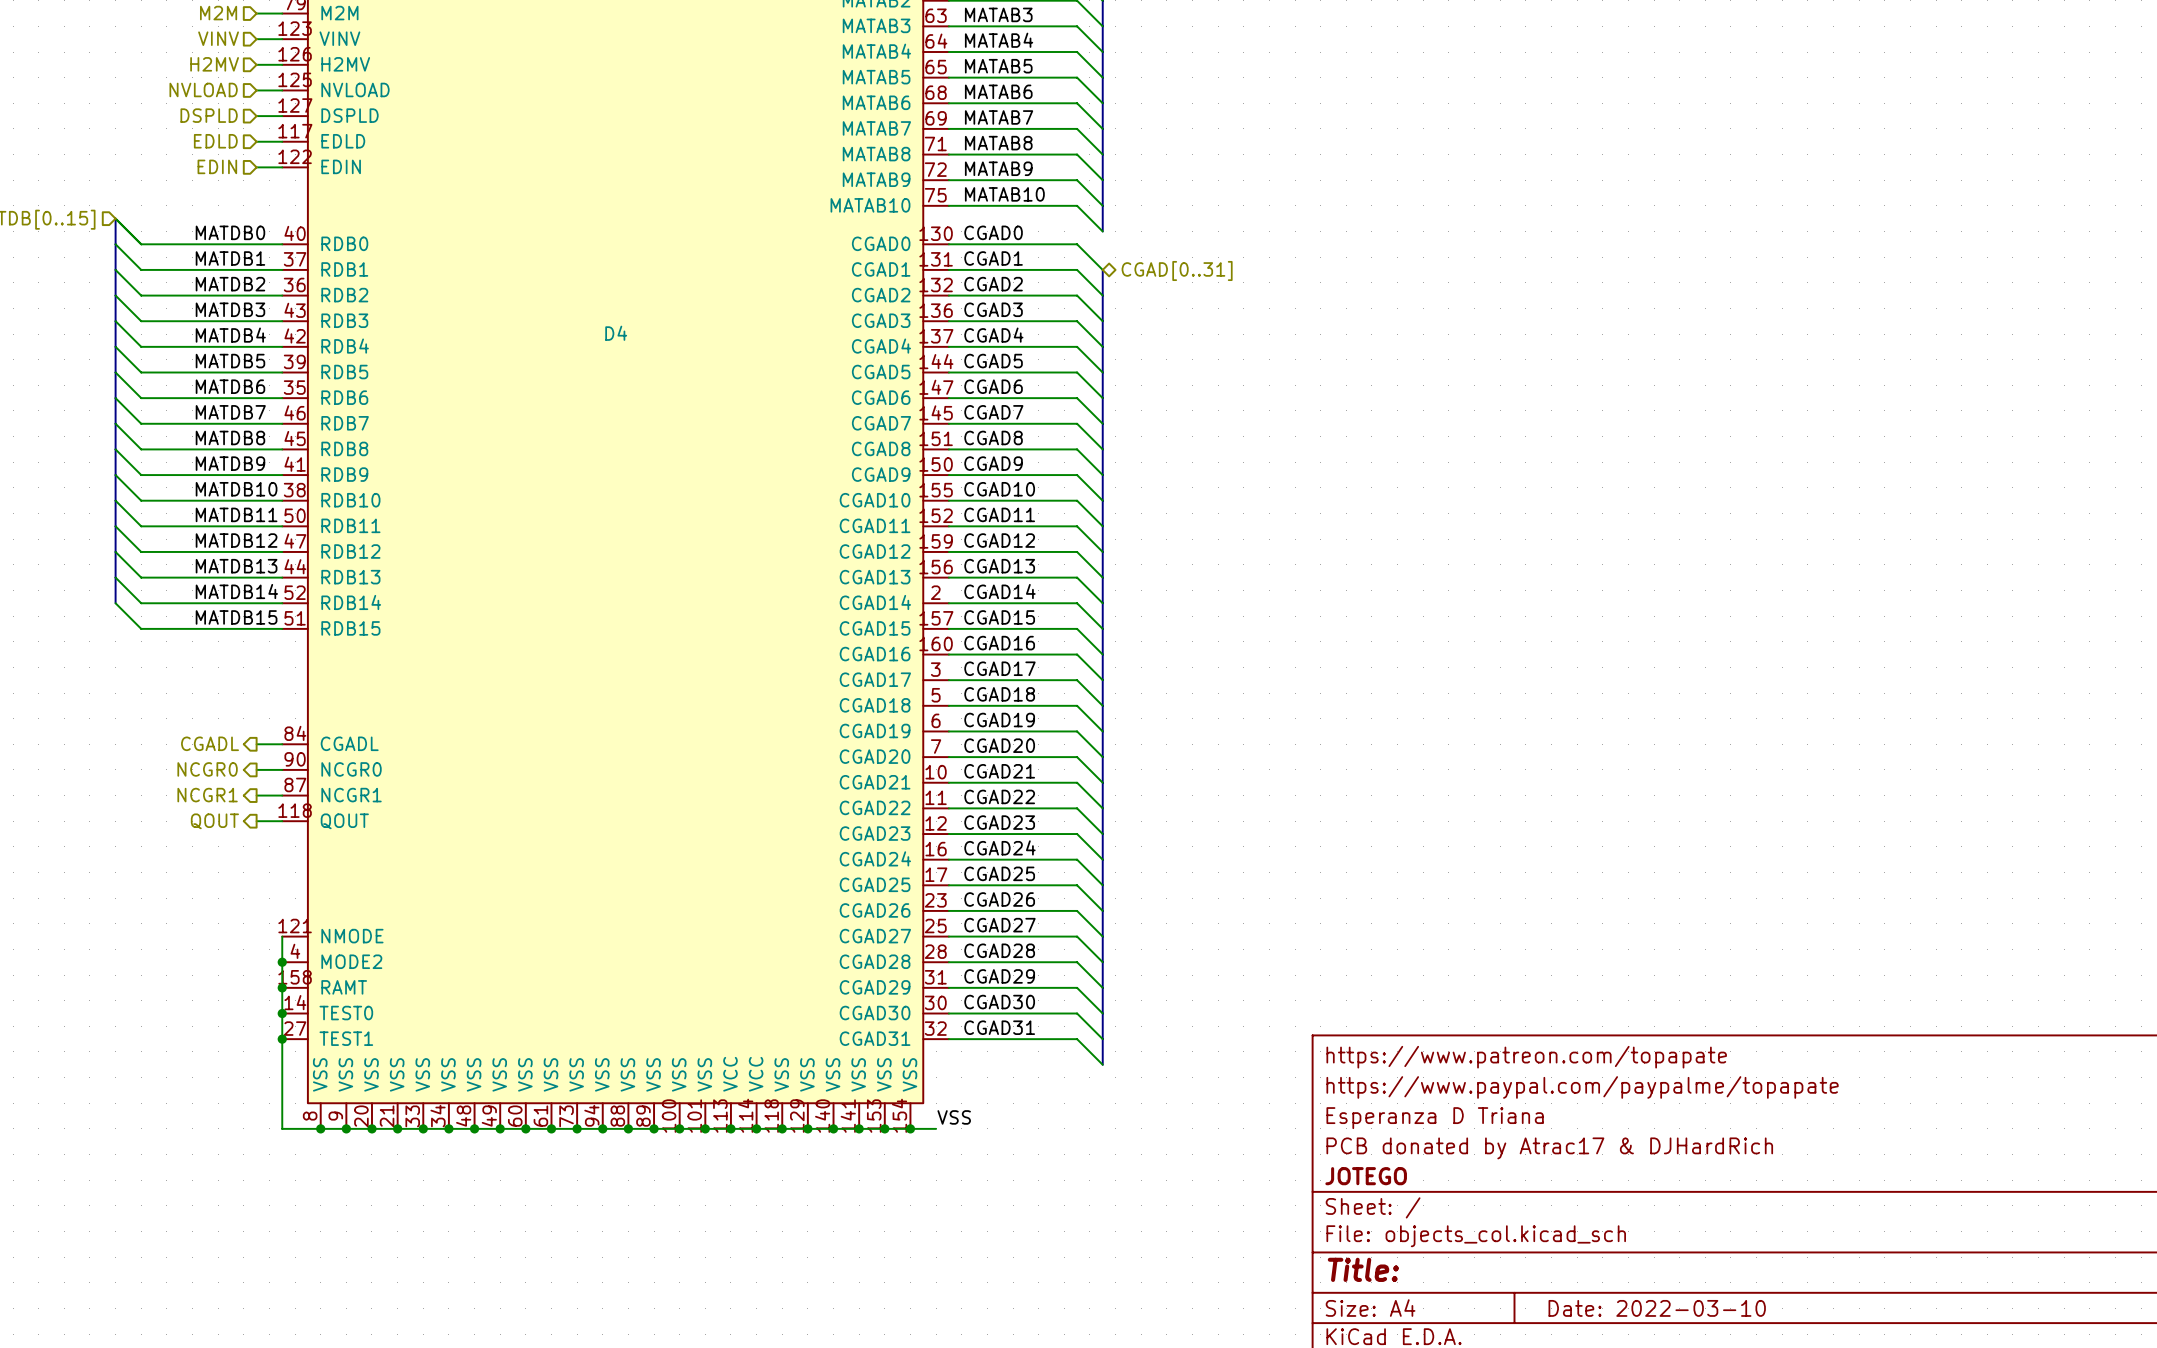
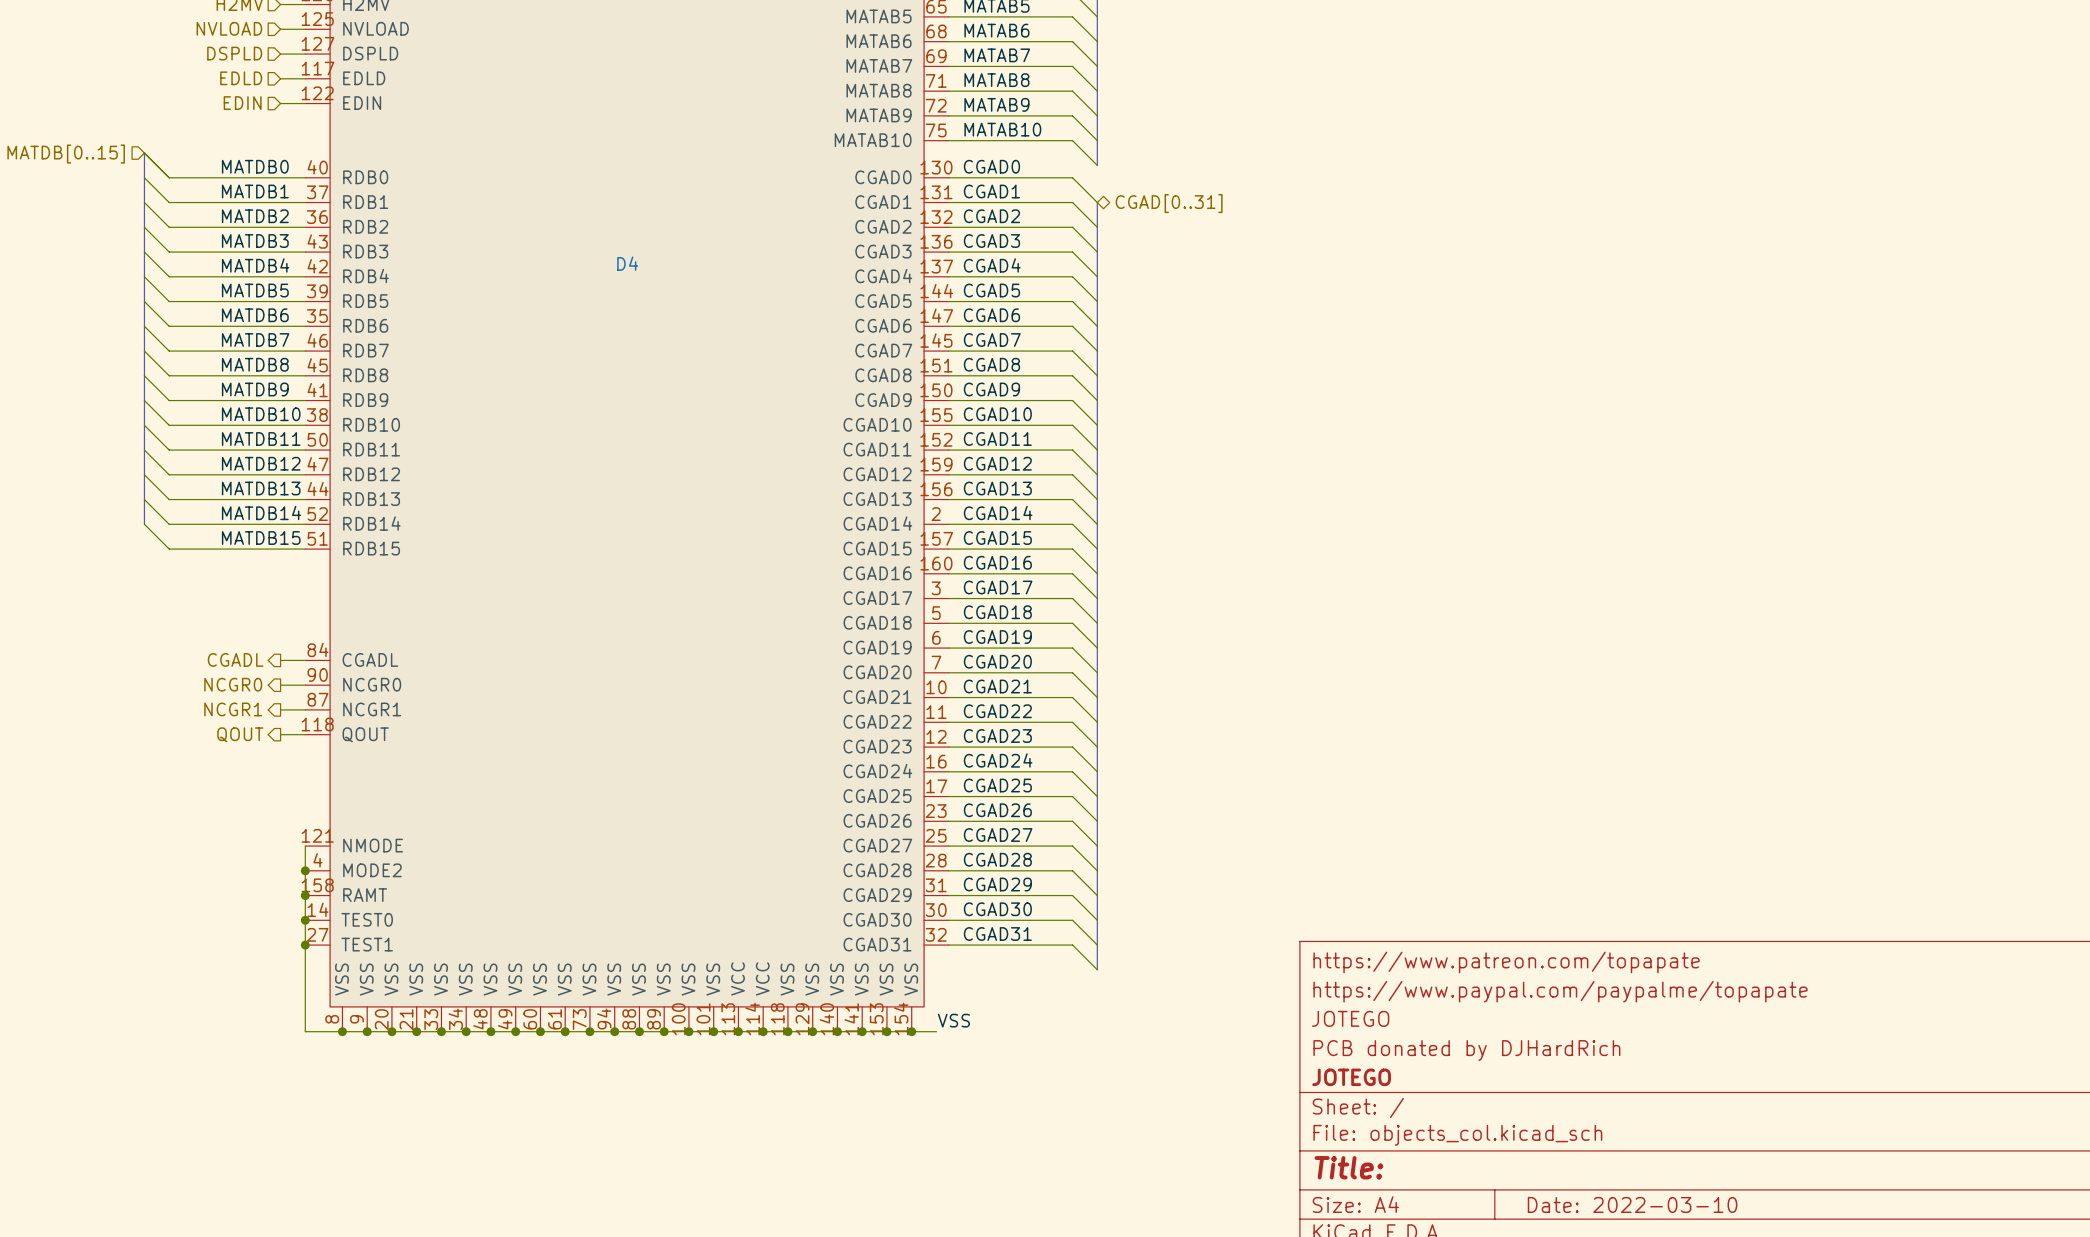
title block: Esperanza D Triana (1435, 1118) -> JOTEGO (1350, 1018)
title block: PCB donated by Atrac17 & DJHardRich (1549, 1148) -> PCB donated by DJHardRich (1466, 1050)

